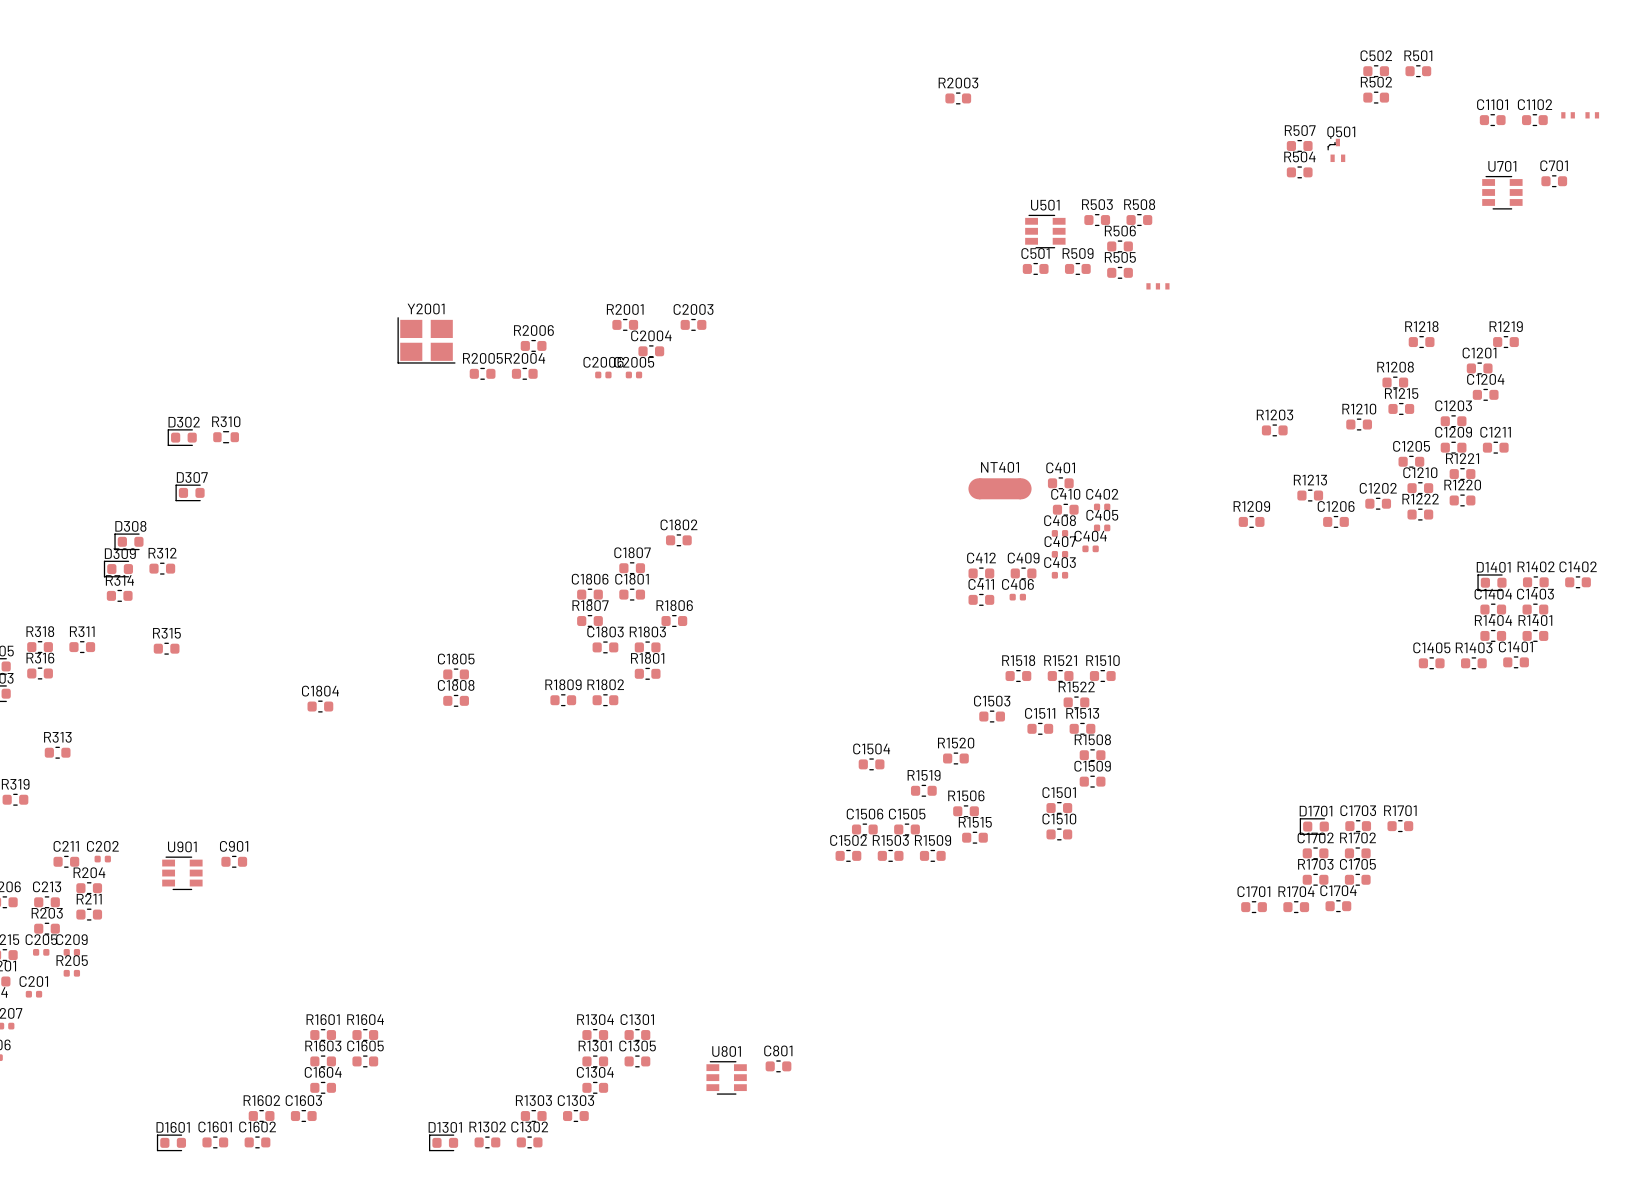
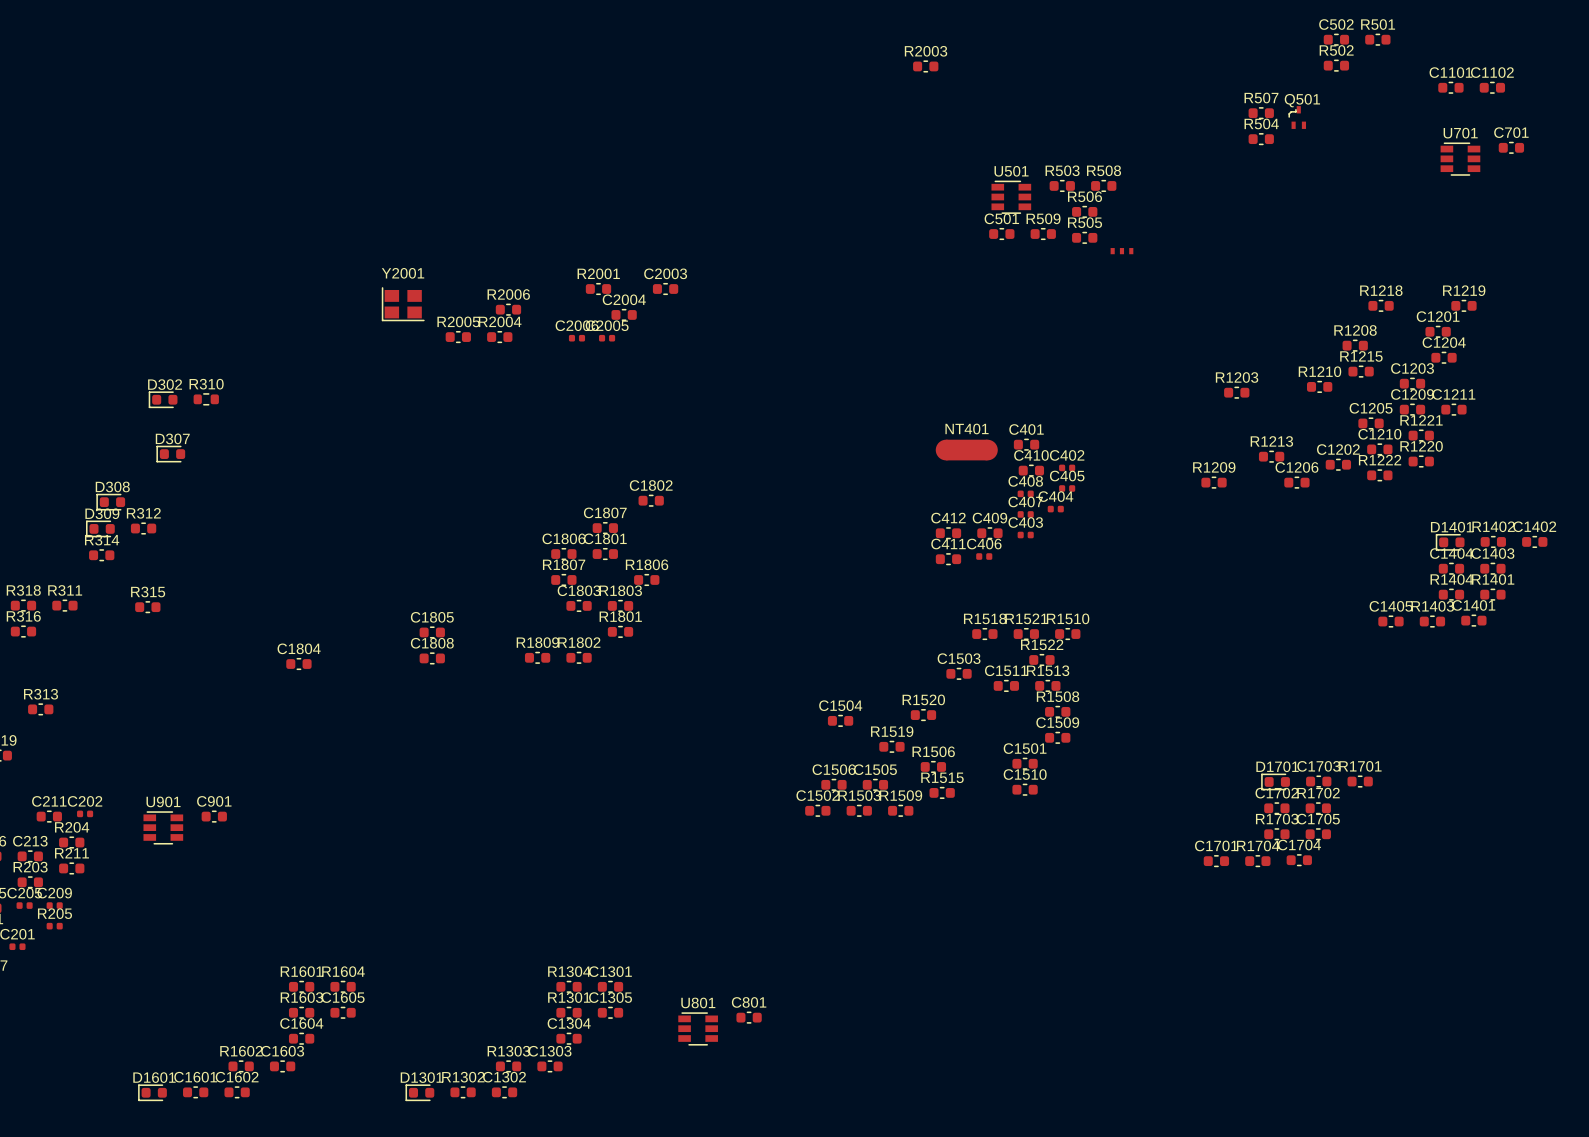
part: (1568, 115) -> none
part: (1592, 115) -> none
Y2001 footprint: [397, 317, 456, 364] -> [381, 287, 425, 322]

